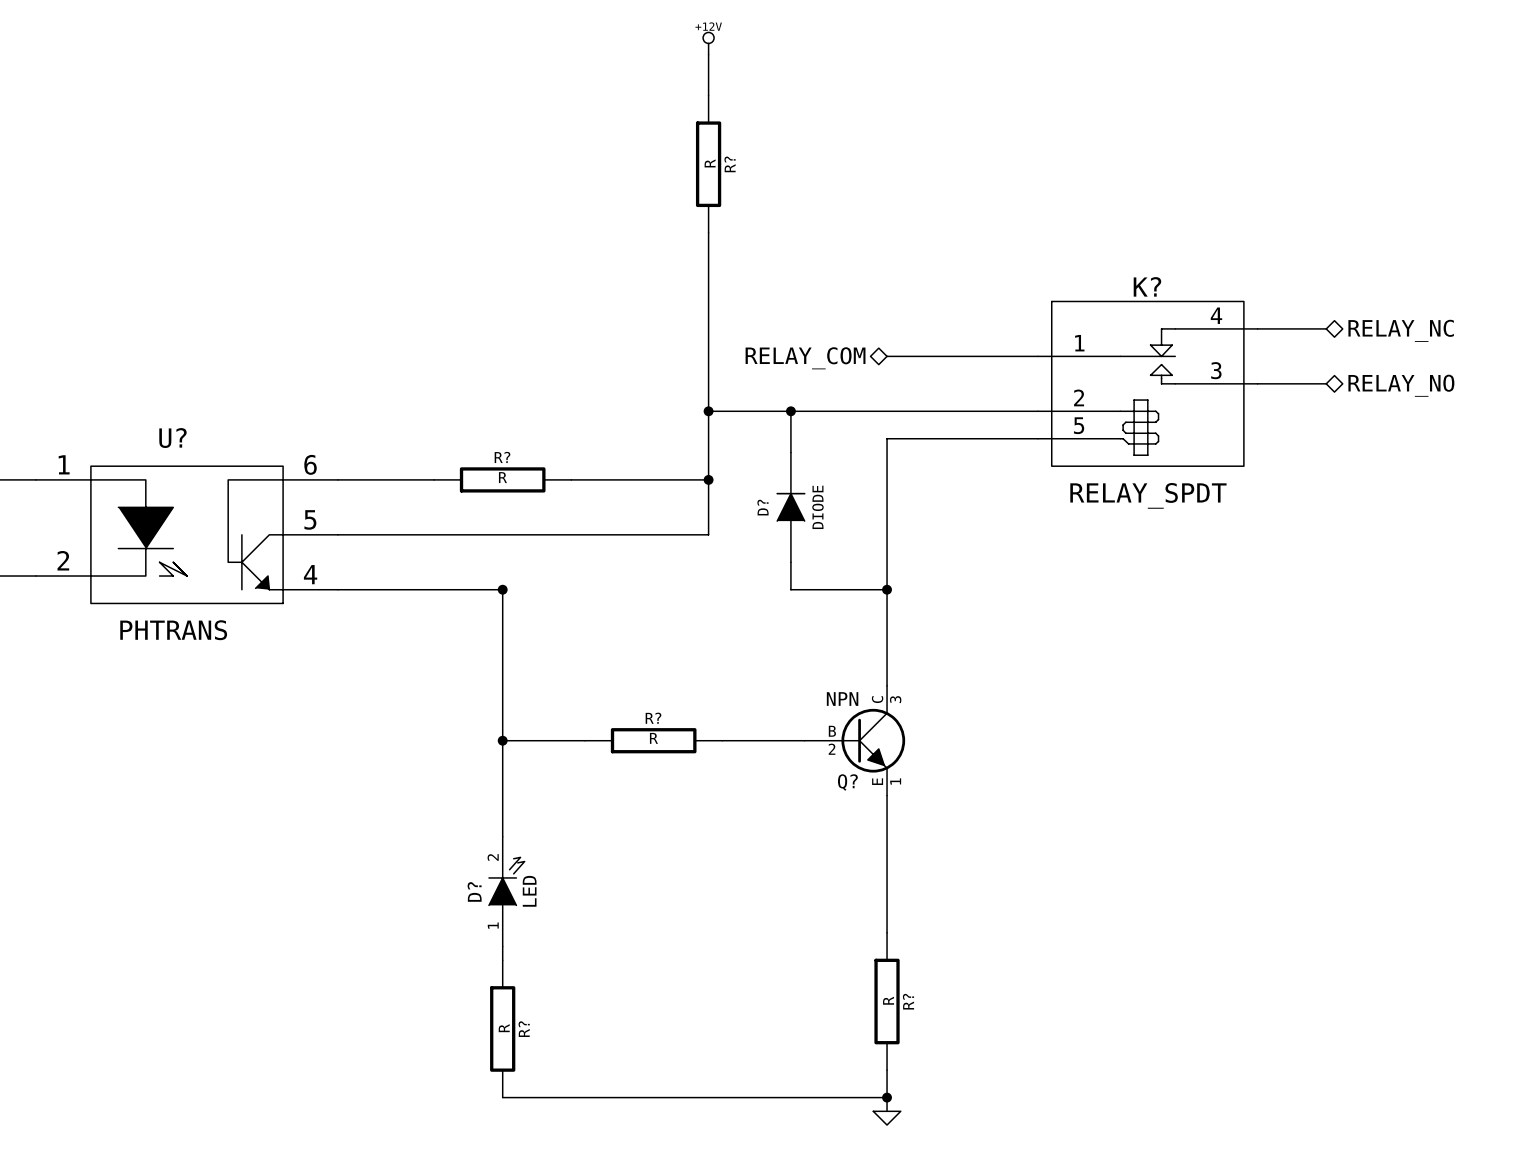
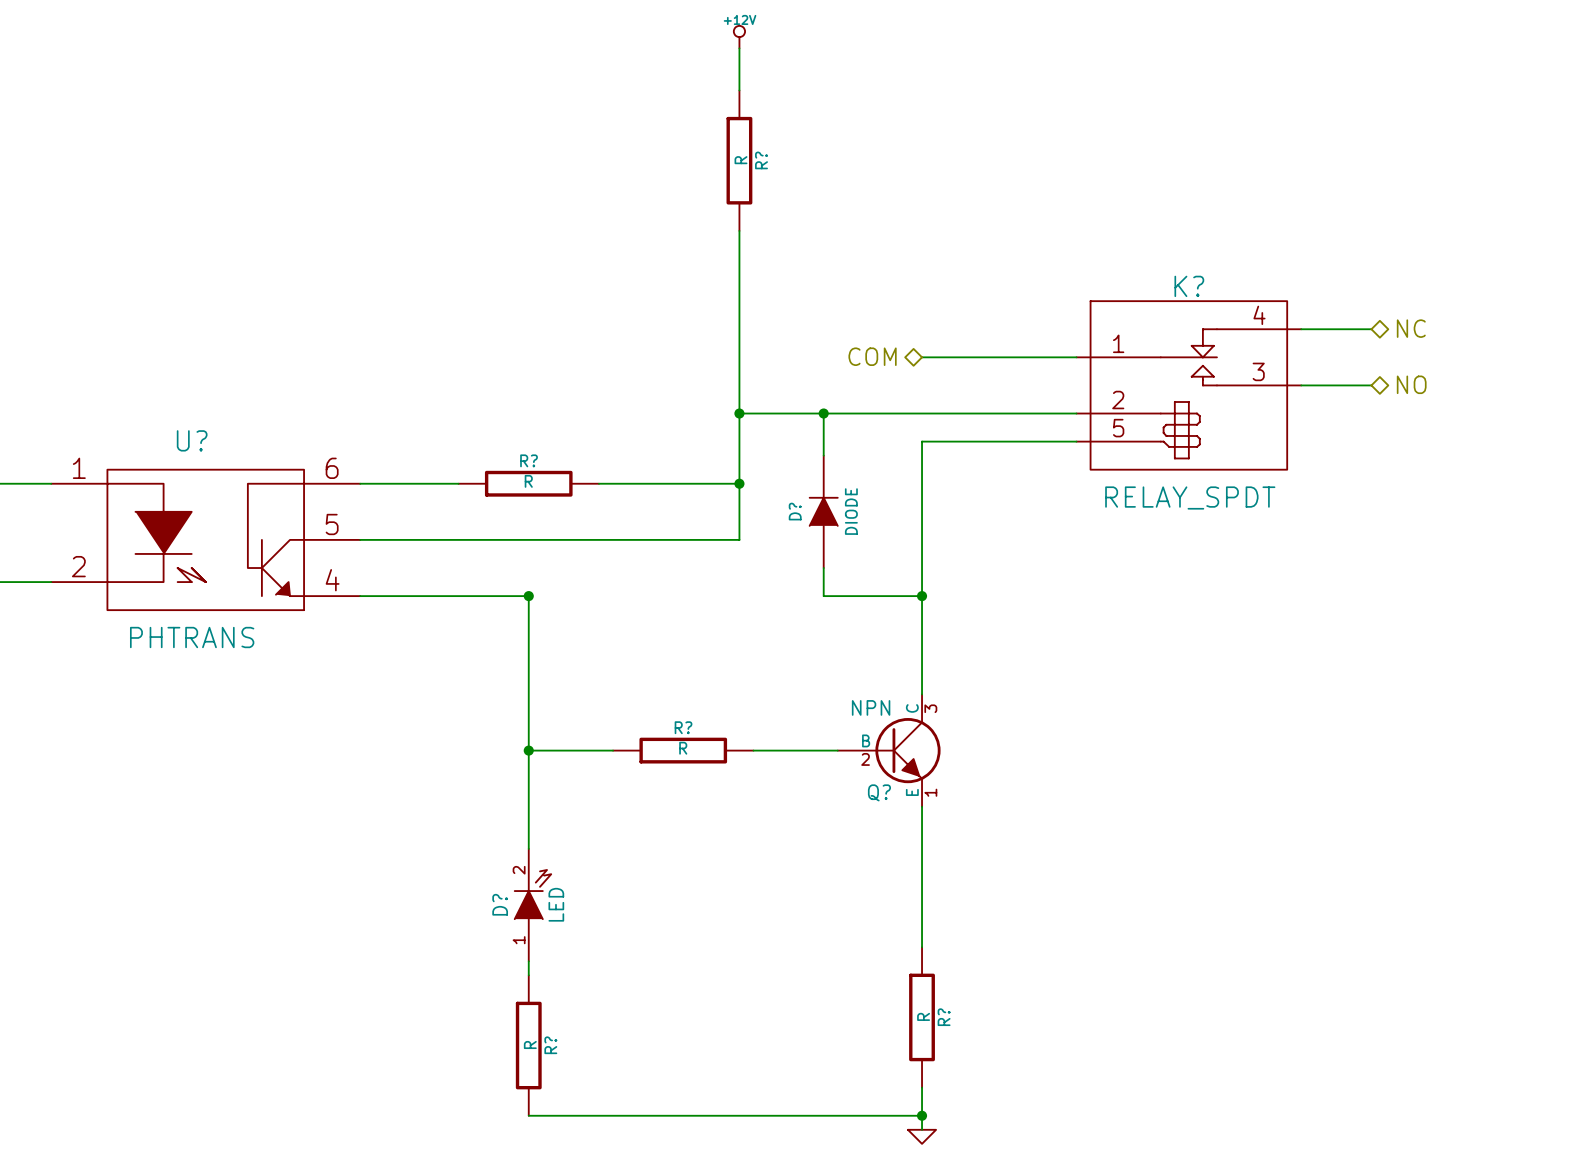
hierarchical label: RELAY_NC (1401, 330) -> NC (1411, 328)
hierarchical label: RELAY_COM (805, 358) -> COM (872, 356)
hierarchical label: RELAY_NO (1401, 385) -> NO (1411, 384)

